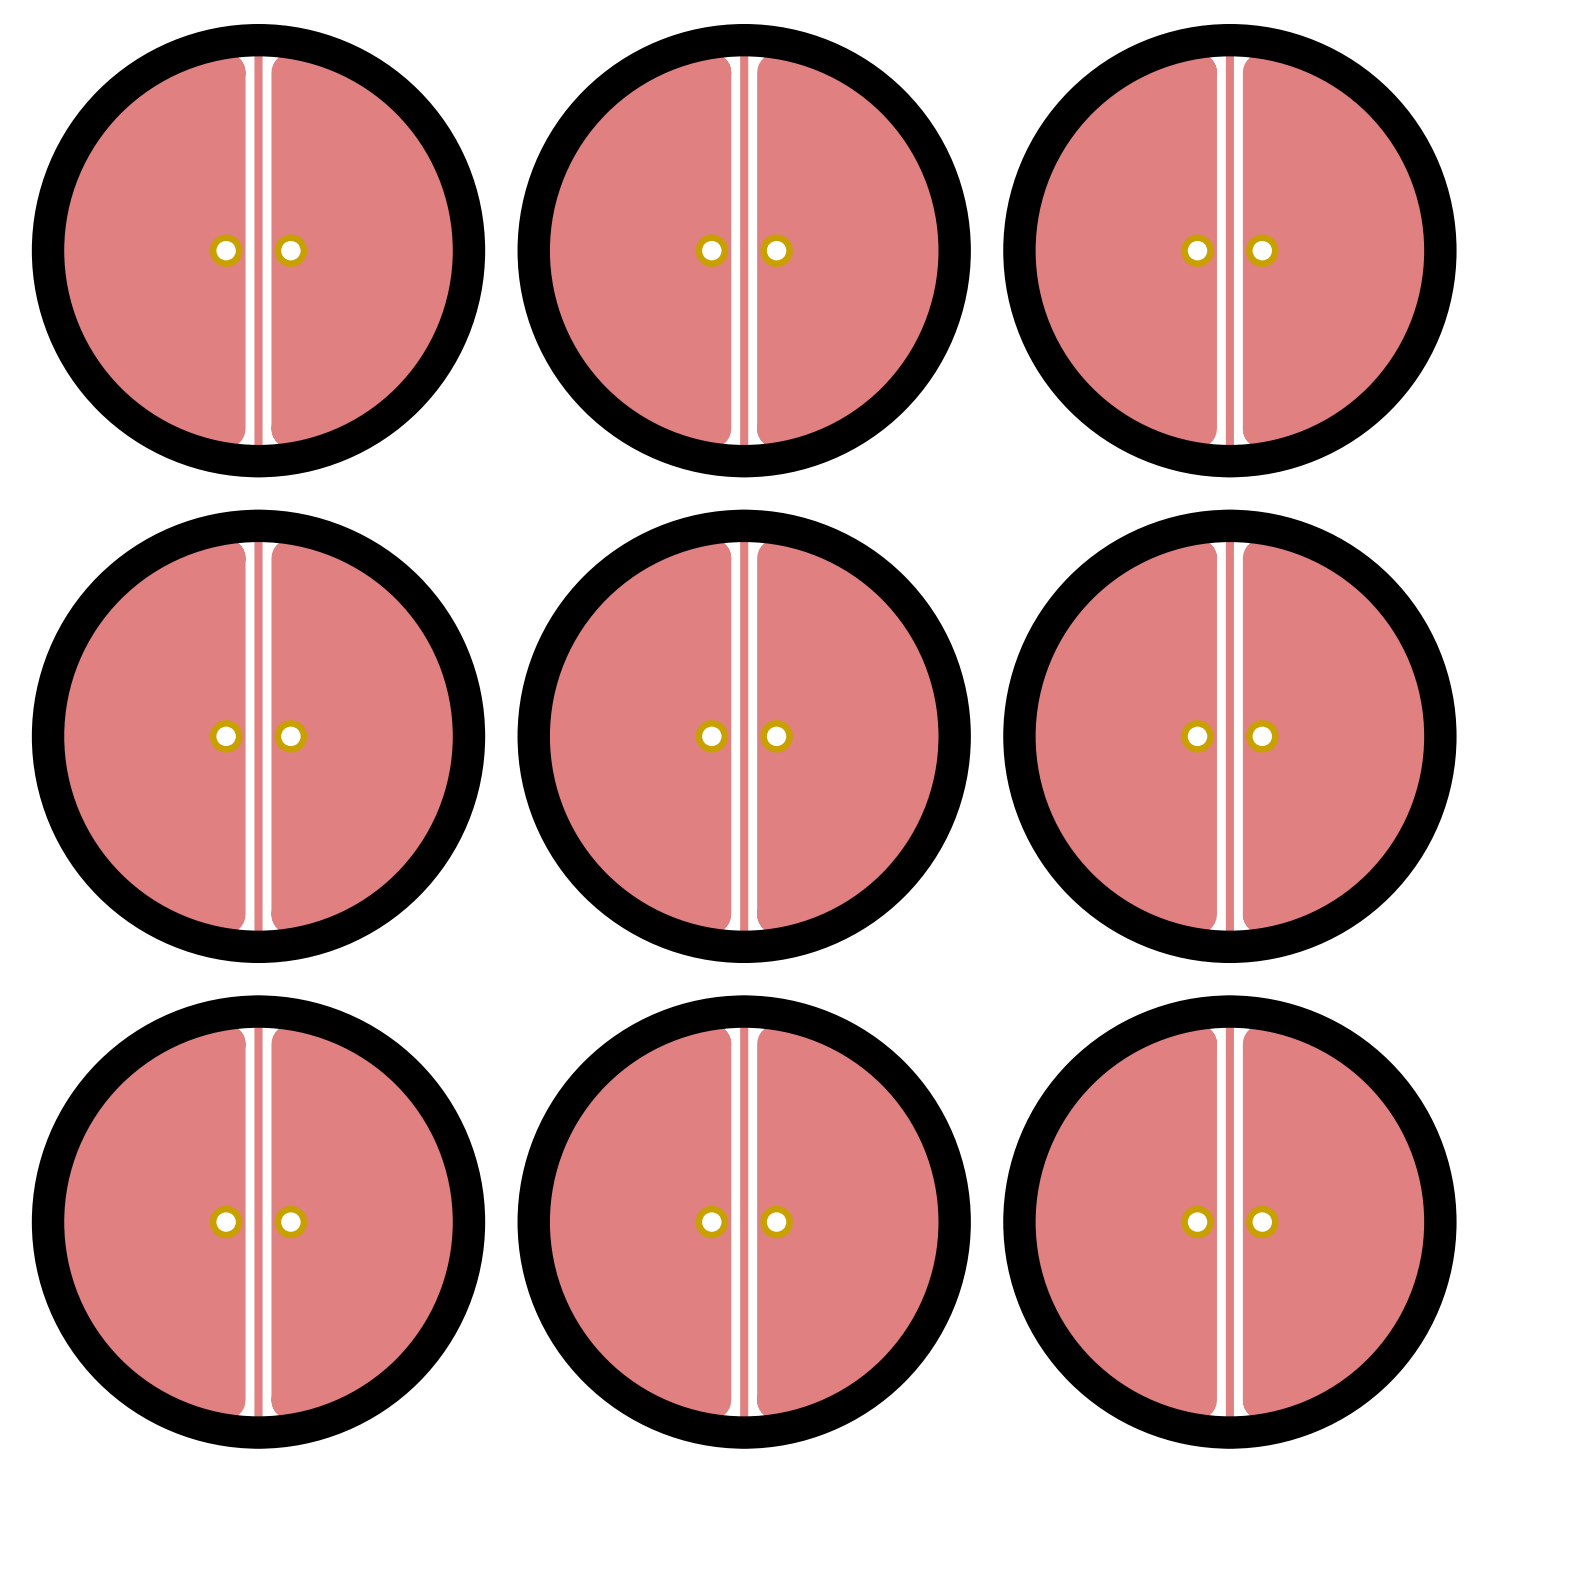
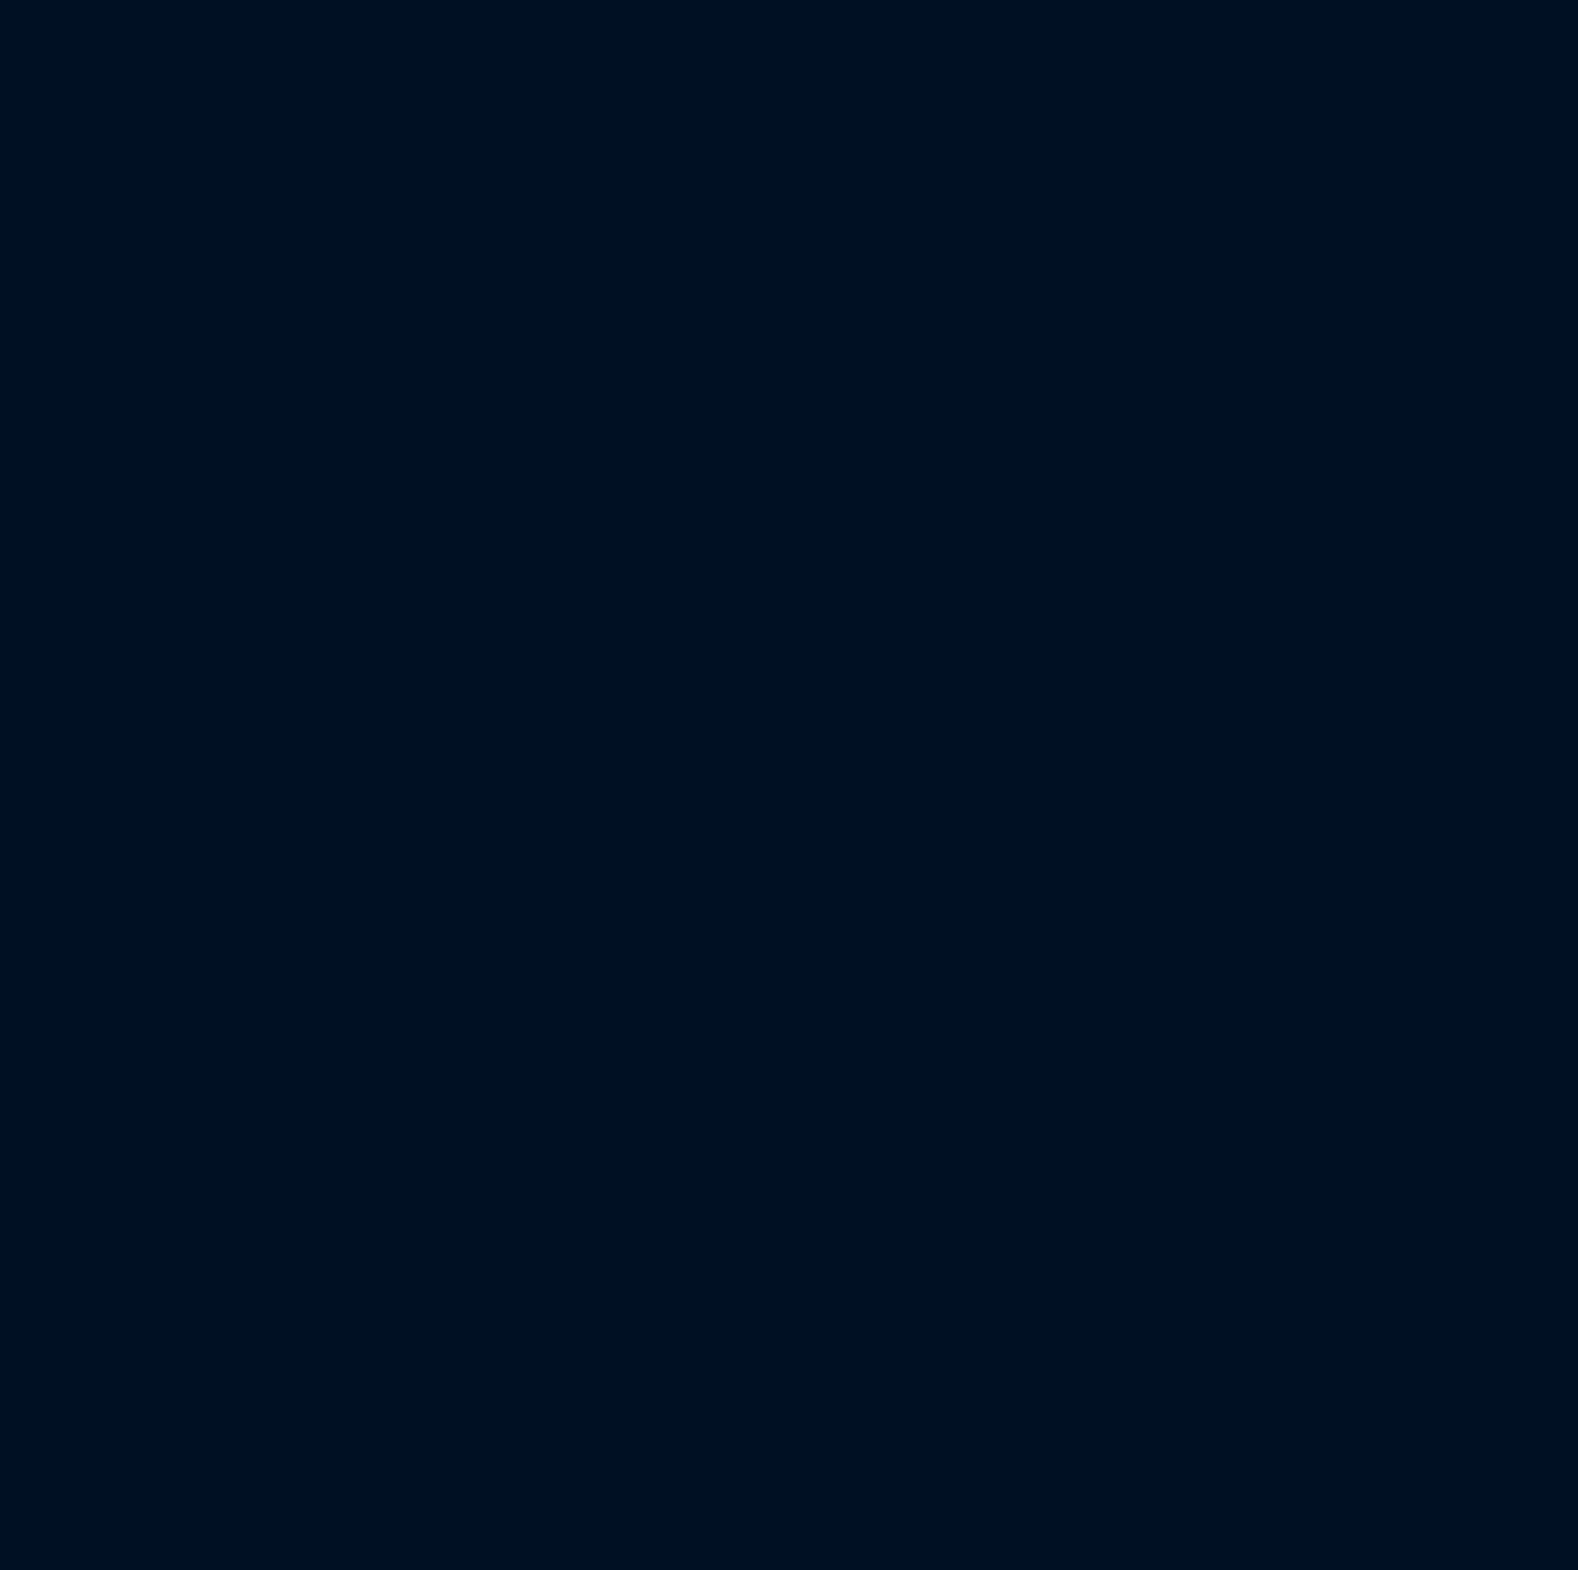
part: (258, 250) -> none
part: (744, 250) -> none
part: (1229, 250) -> none
part: (258, 736) -> none
part: (744, 736) -> none
part: (1229, 736) -> none
part: (258, 1222) -> none
part: (744, 1222) -> none
part: (1229, 1222) -> none

